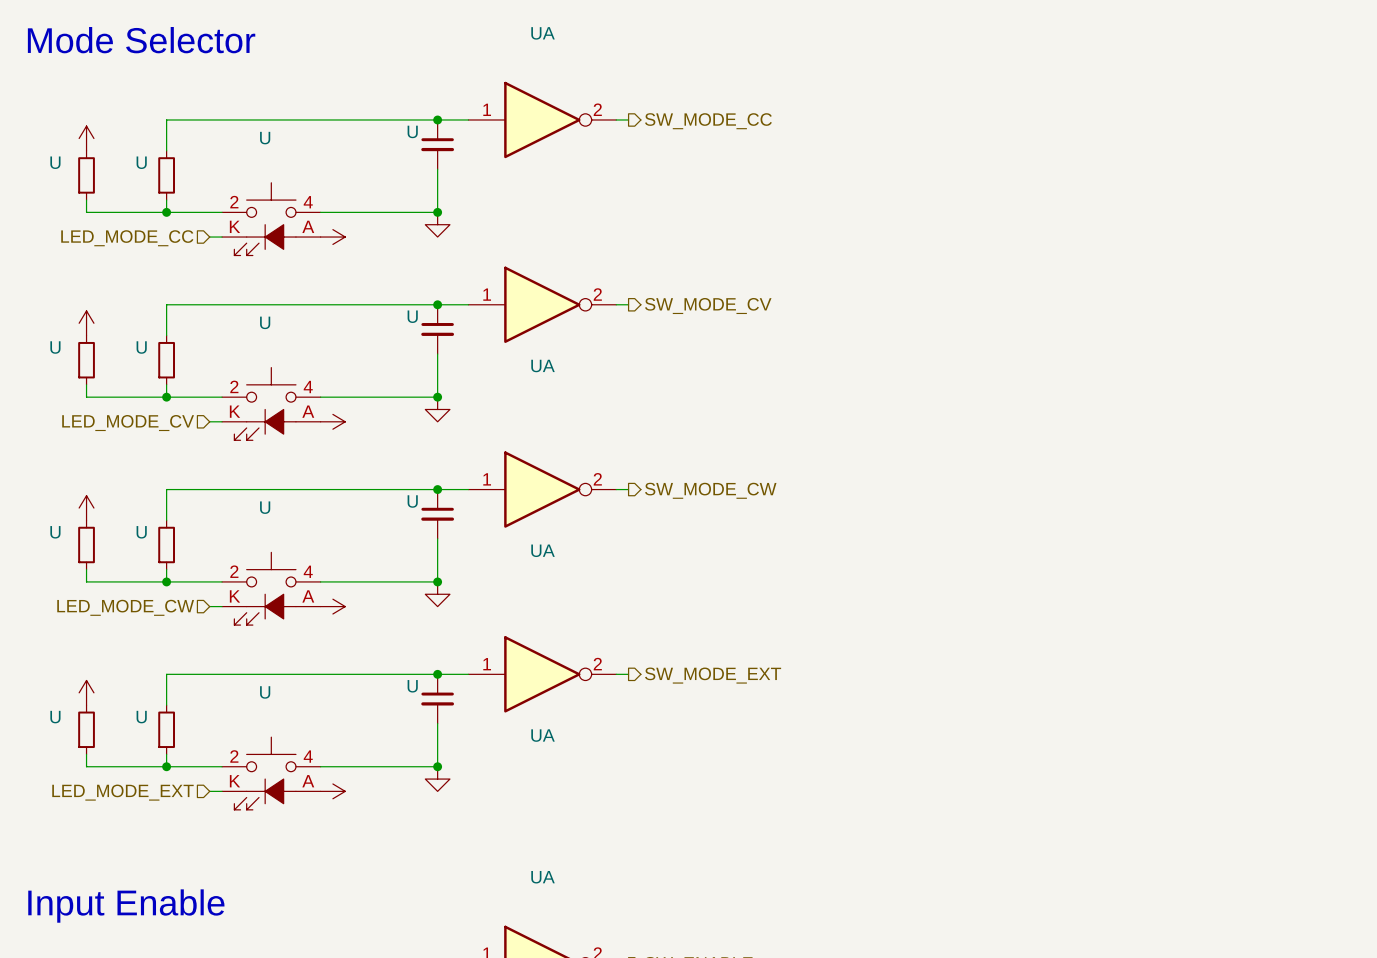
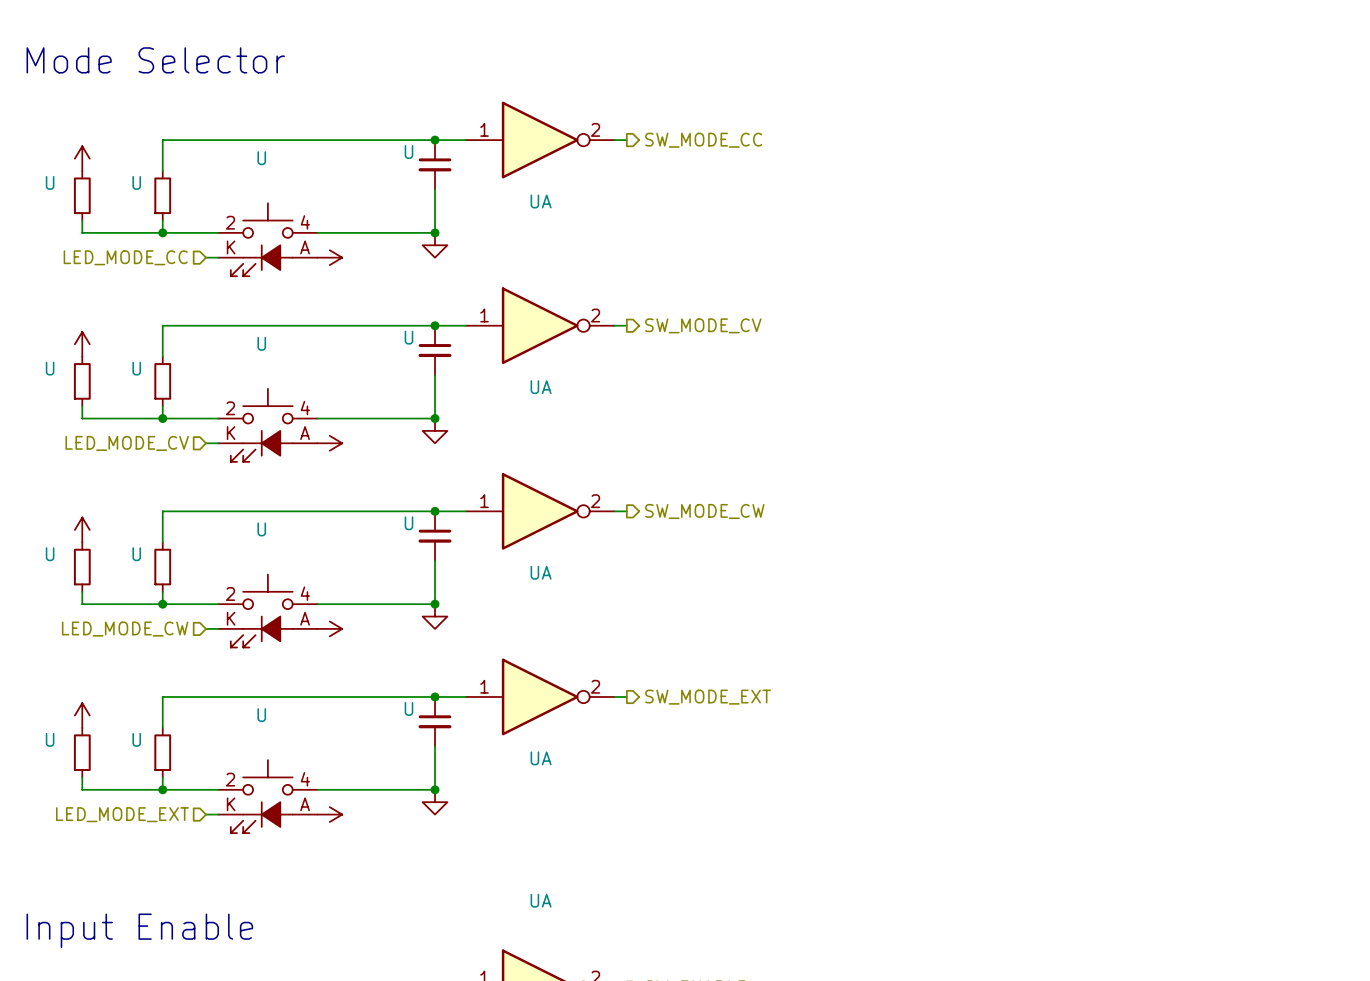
UA name position: UA (543, 33) -> UA (541, 201)

